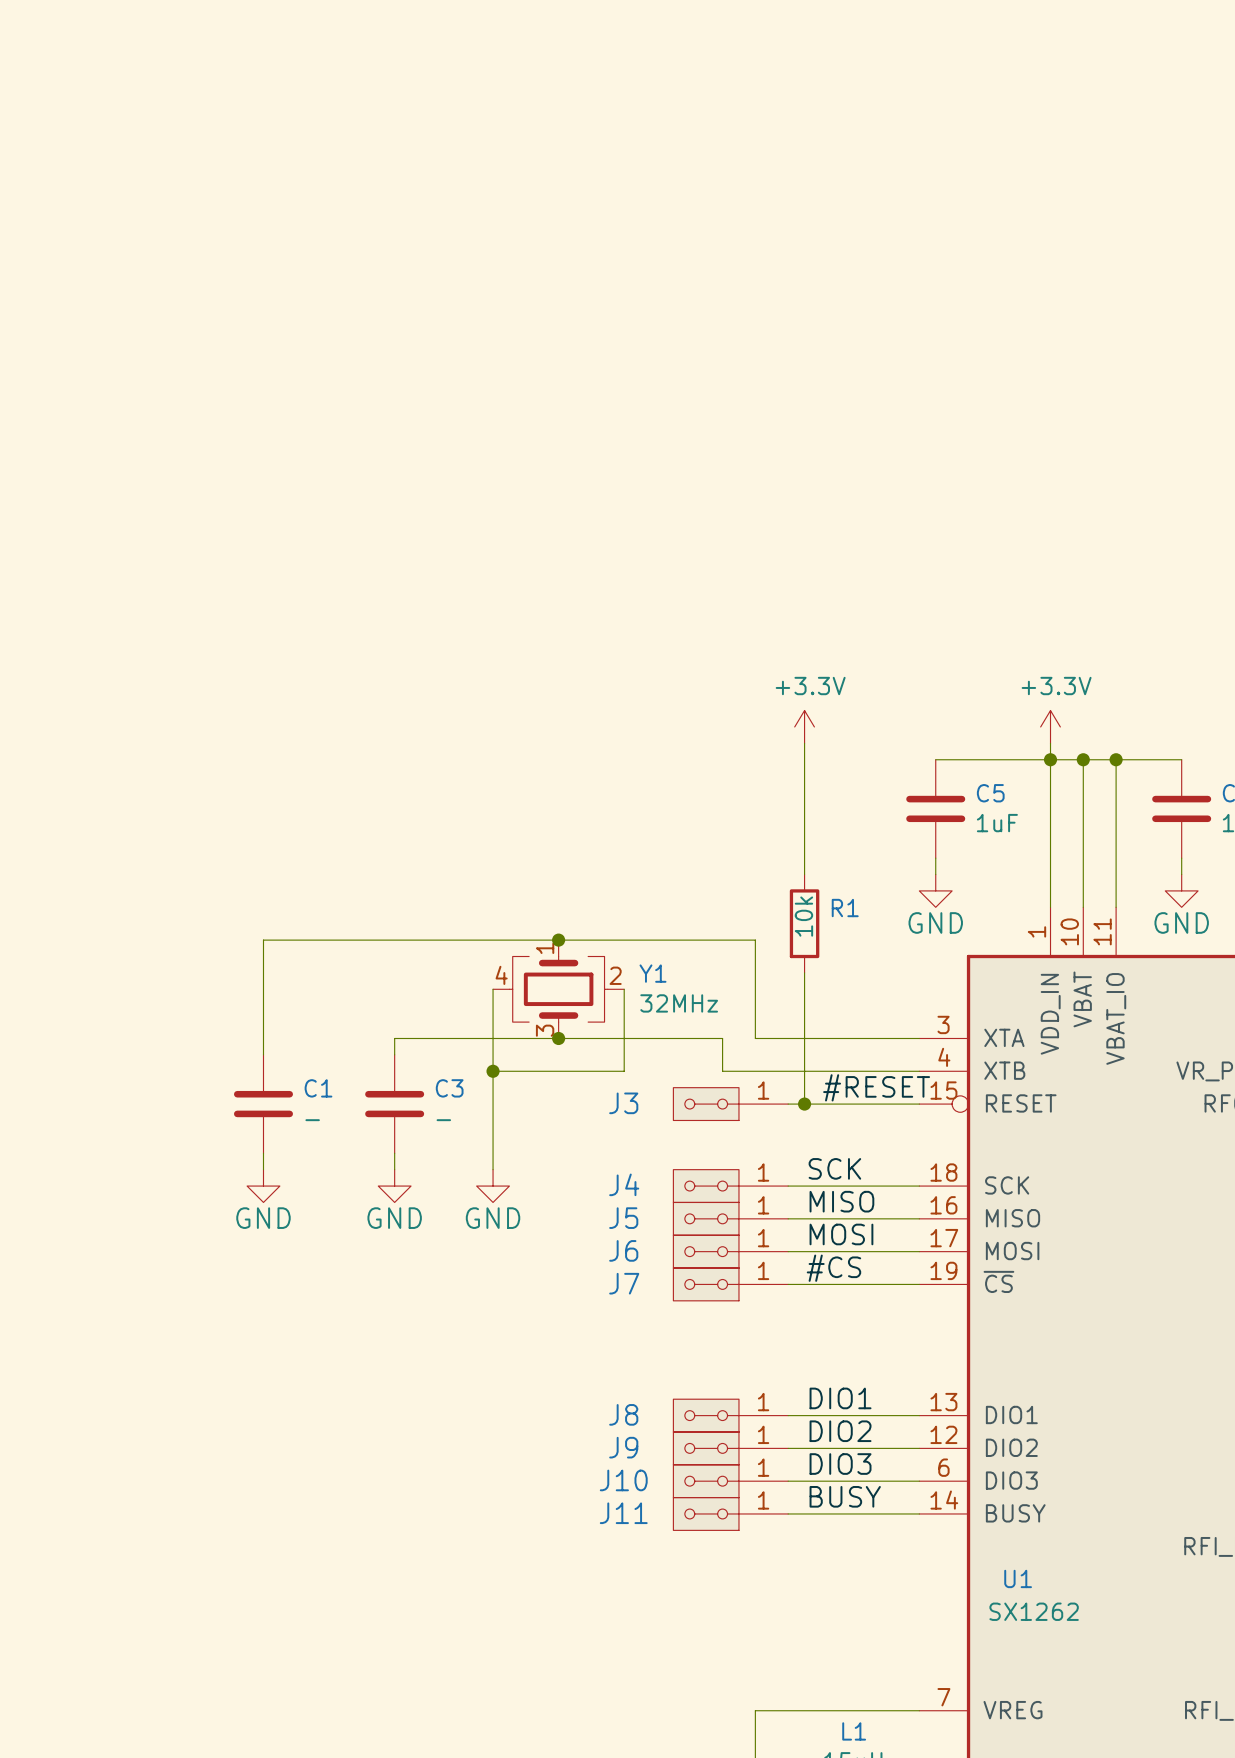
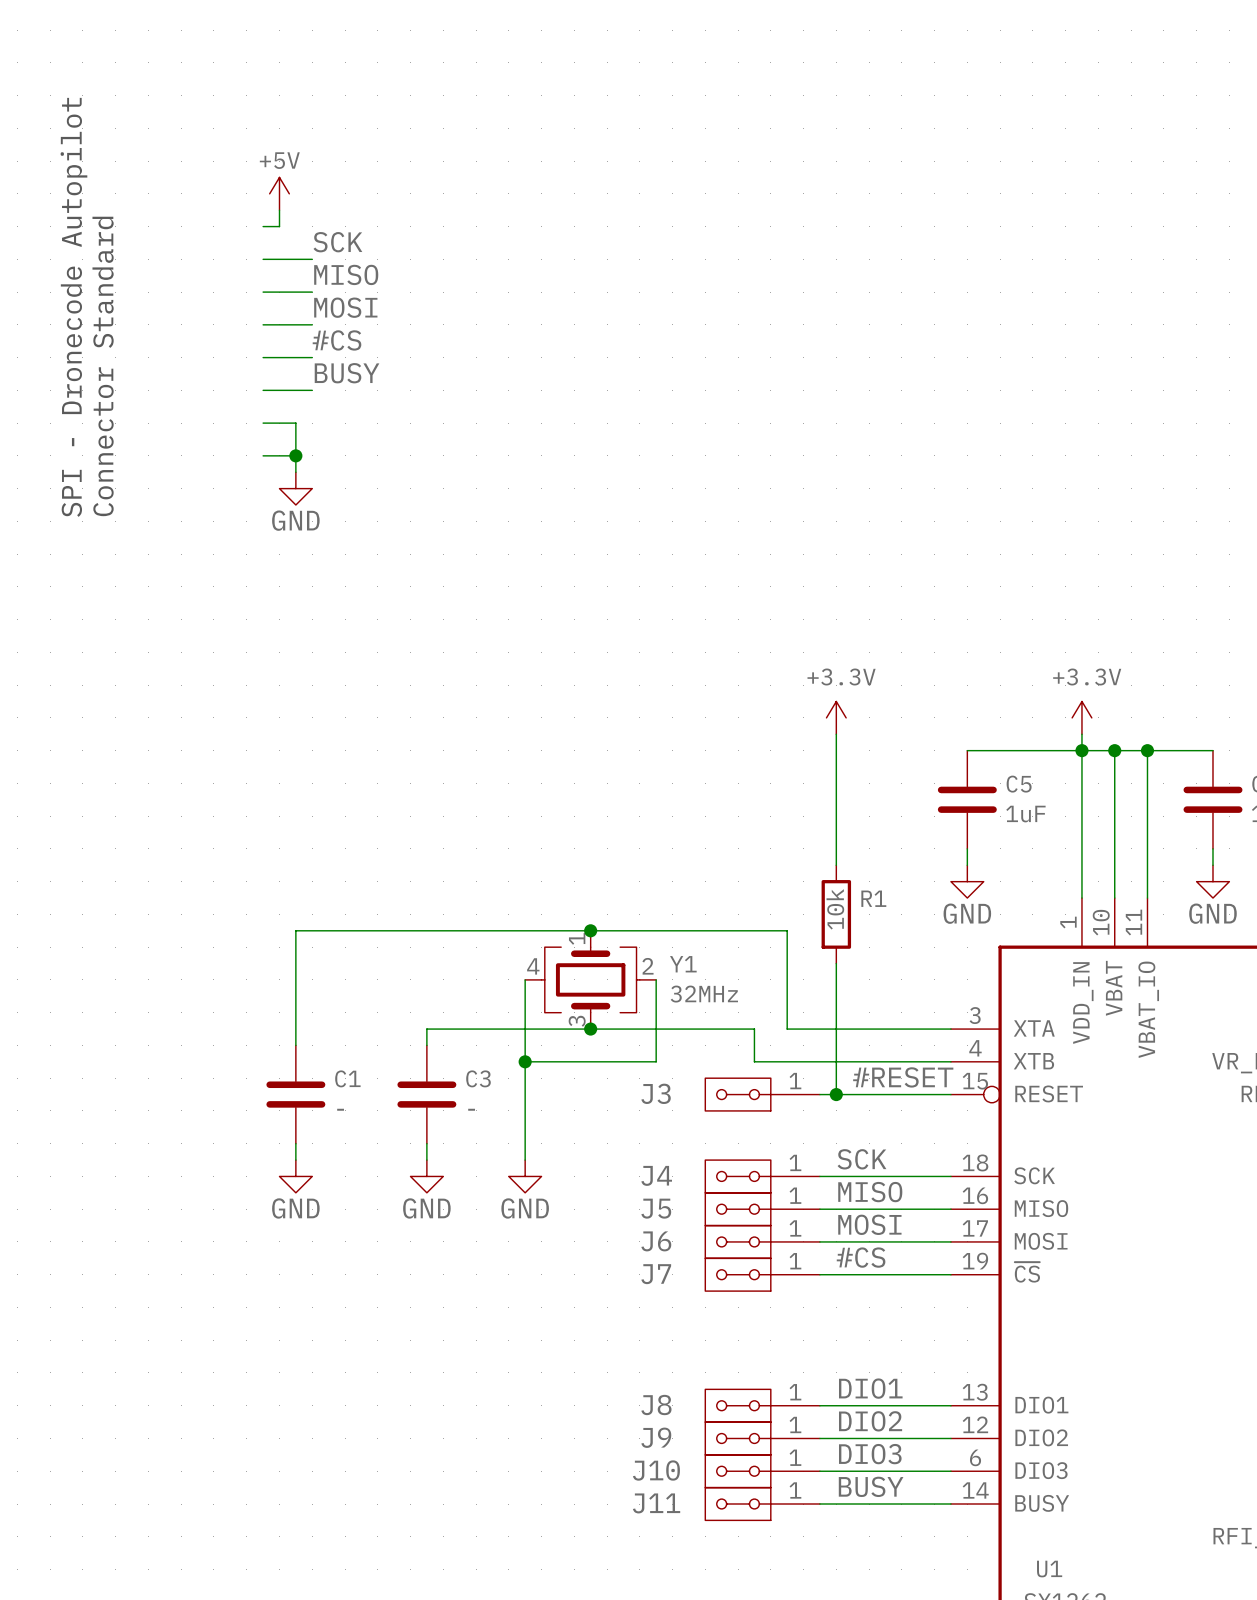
power symbol: none -> +5V (279, 193)
wire: none -> (279, 210) (279, 226) (263, 226)
label: none -> SCK (337, 242)
wire: none -> (263, 259) (312, 259)
label: none -> MISO (346, 274)
wire: none -> (263, 292) (312, 292)
label: none -> MOSI (345, 307)
text: none -> SPI - Dronecode Autopilot (73, 307)
wire: none -> (263, 324) (312, 324)
label: none -> #CS (337, 340)
wire: none -> (263, 357) (312, 357)
text: none -> Connector Standard (103, 366)
label: none -> BUSY (347, 373)
wire: none -> (263, 390) (312, 390)
wire: none -> (263, 423) (295, 423) (295, 472)
wire: none -> (263, 455) (295, 455)
junction: none -> (295, 455)
power symbol: none -> GND (295, 488)

